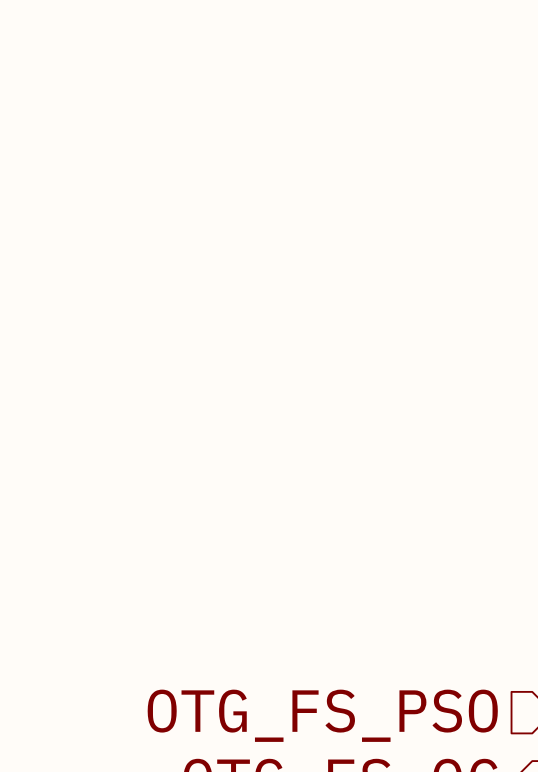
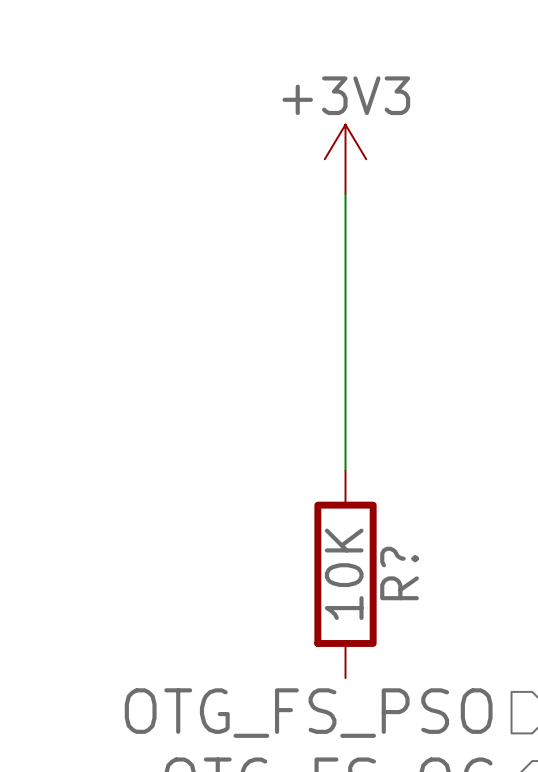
power symbol: none -> +3V3 (345, 159)
wire: none -> (345, 193) (345, 470)
R?: none -> 10K (345, 574)

